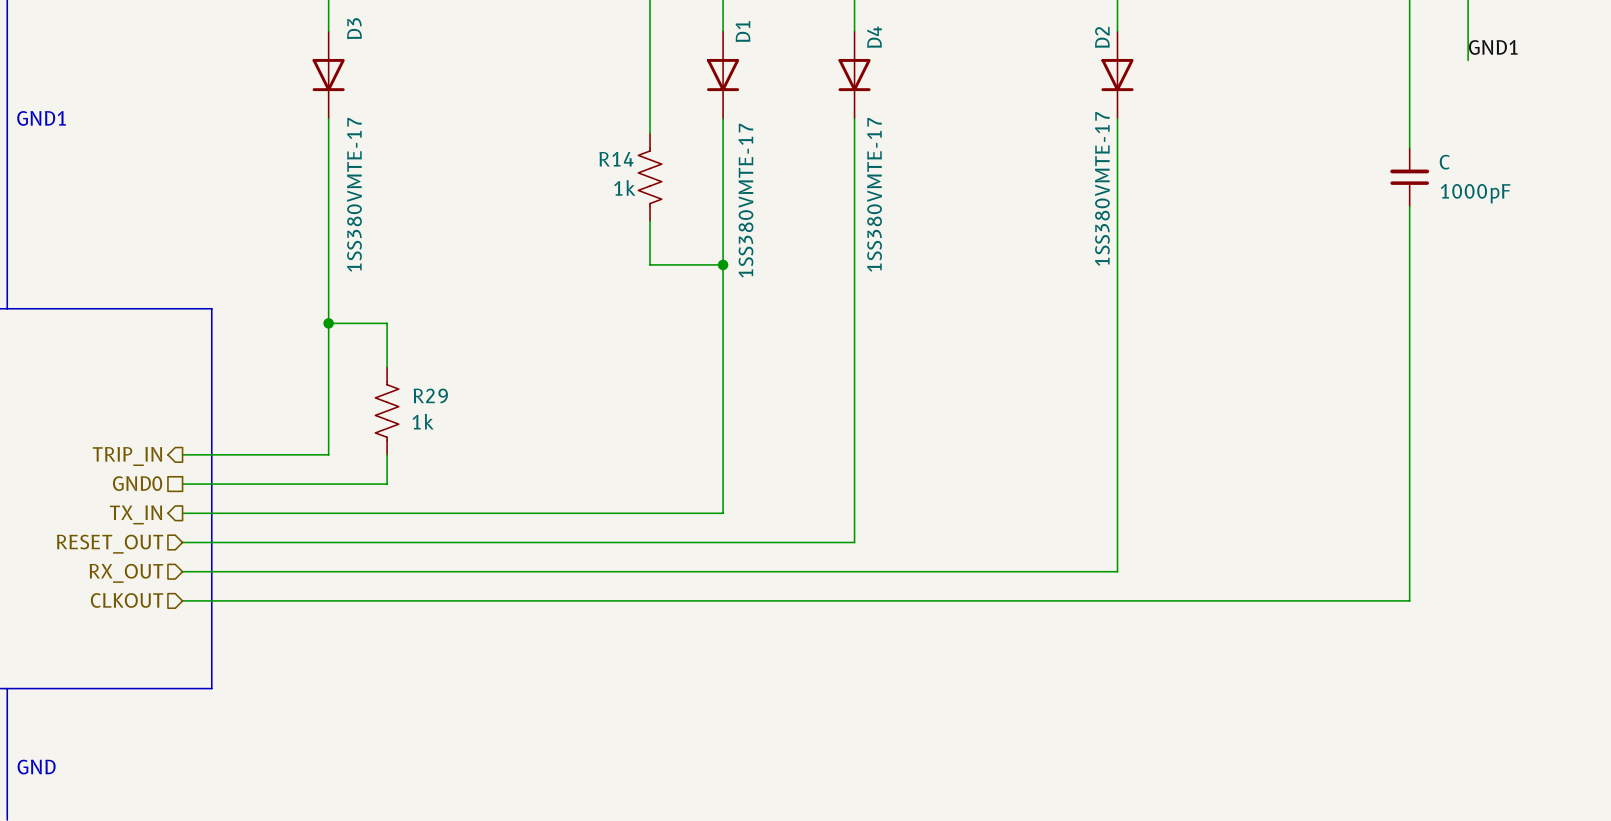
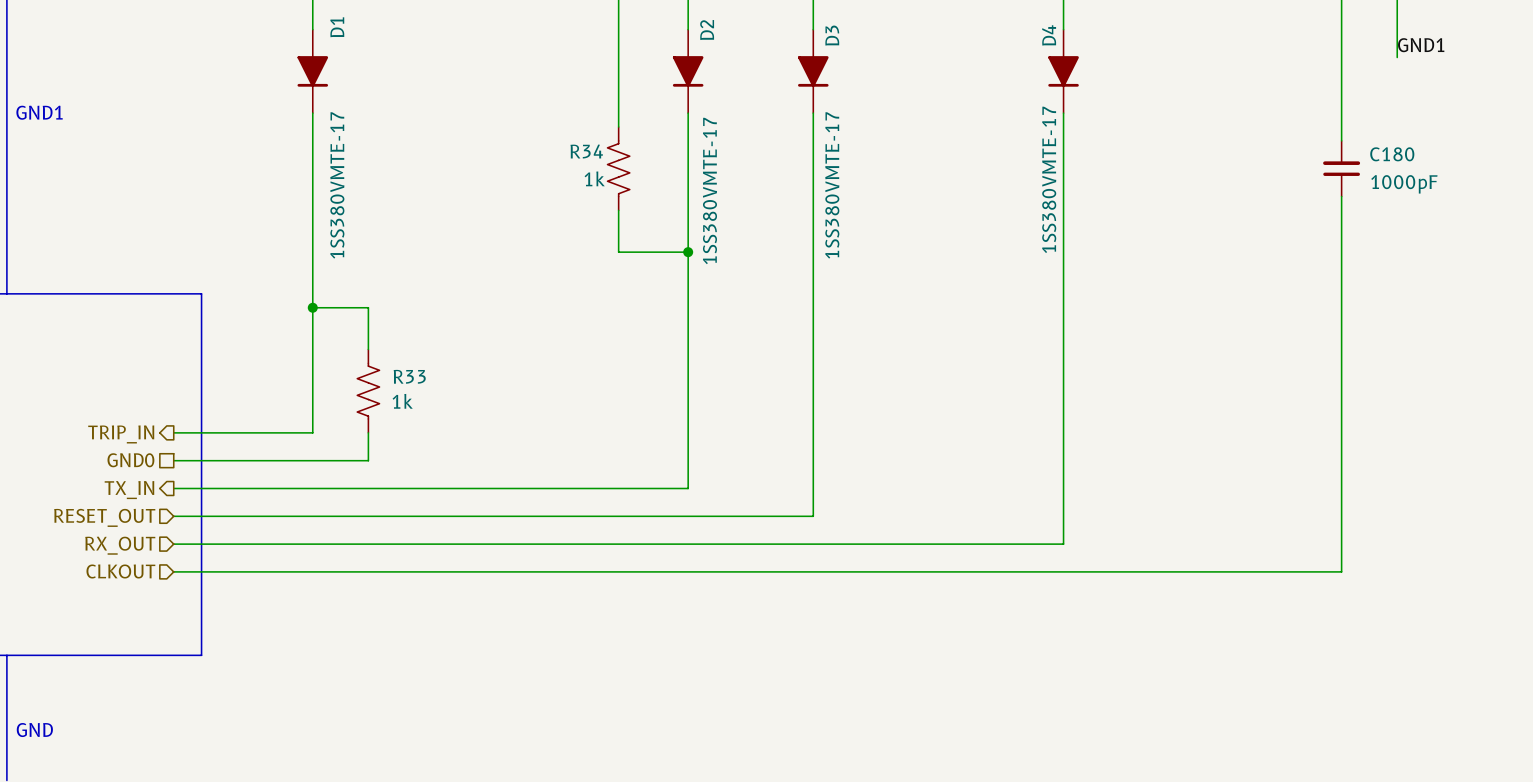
D3 symbol: [312, 31, 345, 119] -> [798, 29, 829, 114]
D1 symbol: [707, 31, 740, 119] -> [297, 29, 329, 114]
D4 symbol: [838, 31, 871, 119] -> [1048, 29, 1079, 114]
D2 symbol: [1101, 31, 1134, 119] -> [672, 29, 704, 114]
D4 name position: D4 (874, 37) -> D4 (1049, 35)
D2 name position: D2 (1102, 37) -> D2 (707, 30)
R14 name: R14 (616, 159) -> R34 (586, 151)
C name: C (1444, 162) -> C180 (1392, 154)
R29 name: R29 (430, 395) -> R33 (409, 376)

